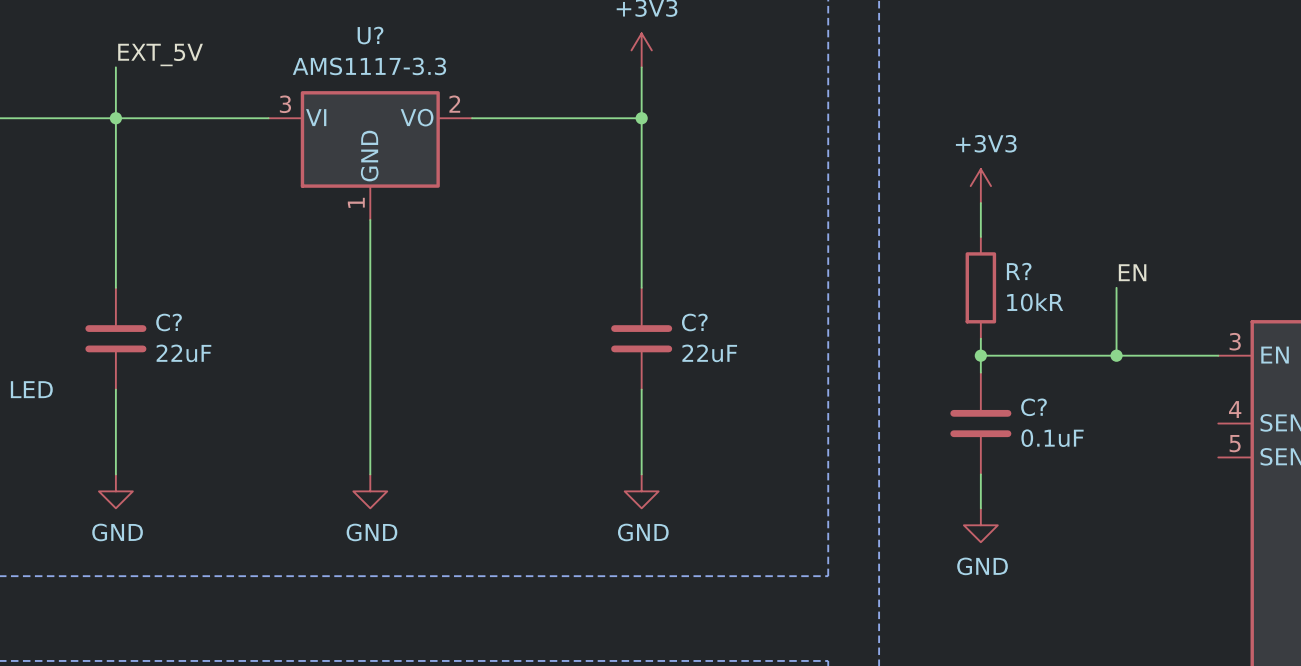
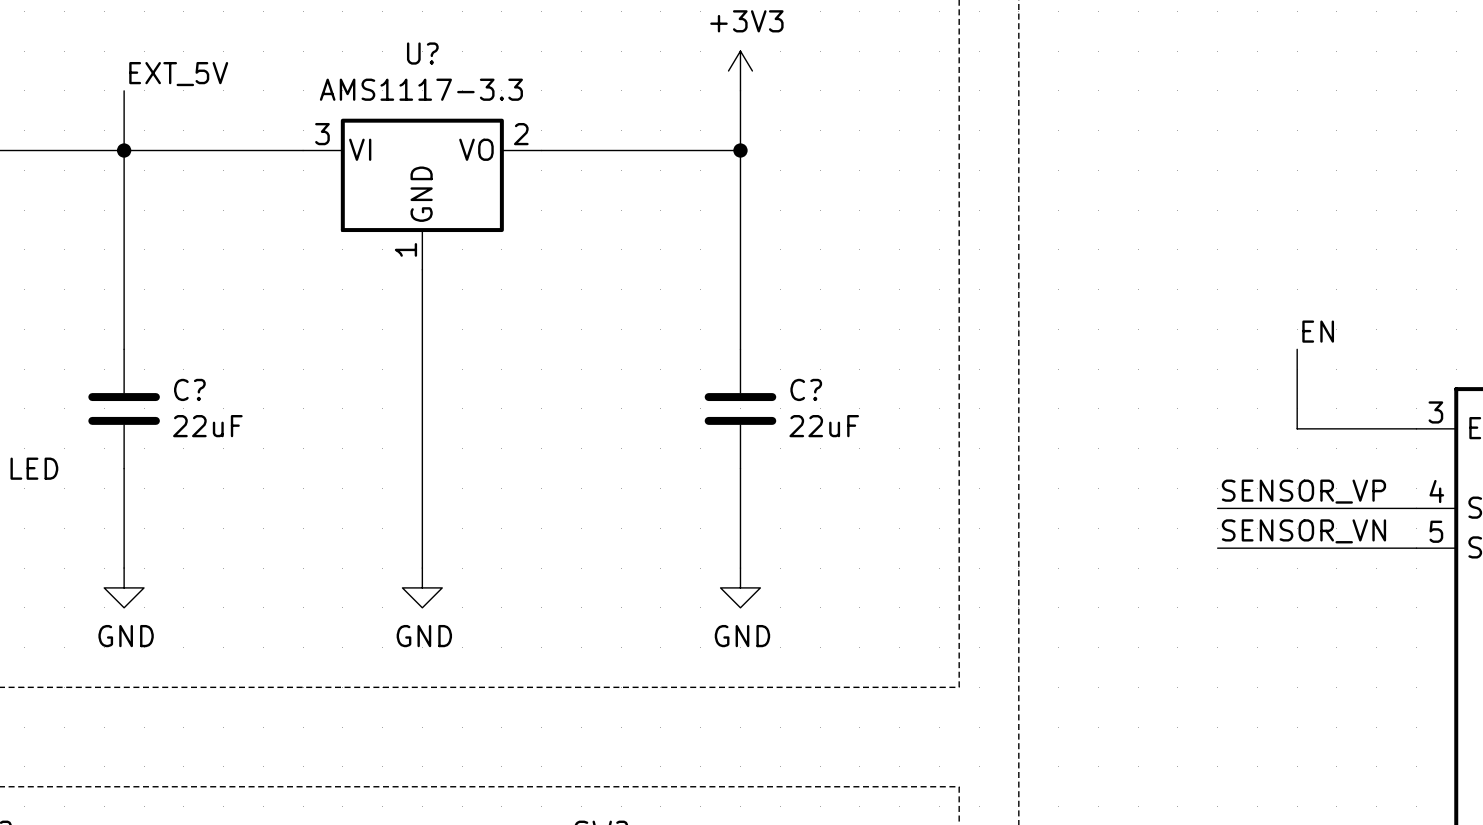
power symbol: +3V3 (980, 186) -> none
wire: (980, 203) (980, 236) -> none
R?: 10kR (980, 287) -> none
wire: (980, 338) (980, 372) -> none
wire: (980, 355) (1116, 355) -> none
junction: (980, 355) -> none
junction: (1116, 355) -> none
label: none -> SENSOR_VP (1303, 491)
C?: 0.1uF (980, 423) -> none
wire: none -> (1217, 508) (1416, 508)
label: none -> SENSOR_VN (1303, 531)
wire: none -> (1217, 548) (1416, 548)
wire: (980, 474) (980, 508) -> none
power symbol: GND (980, 525) -> none

